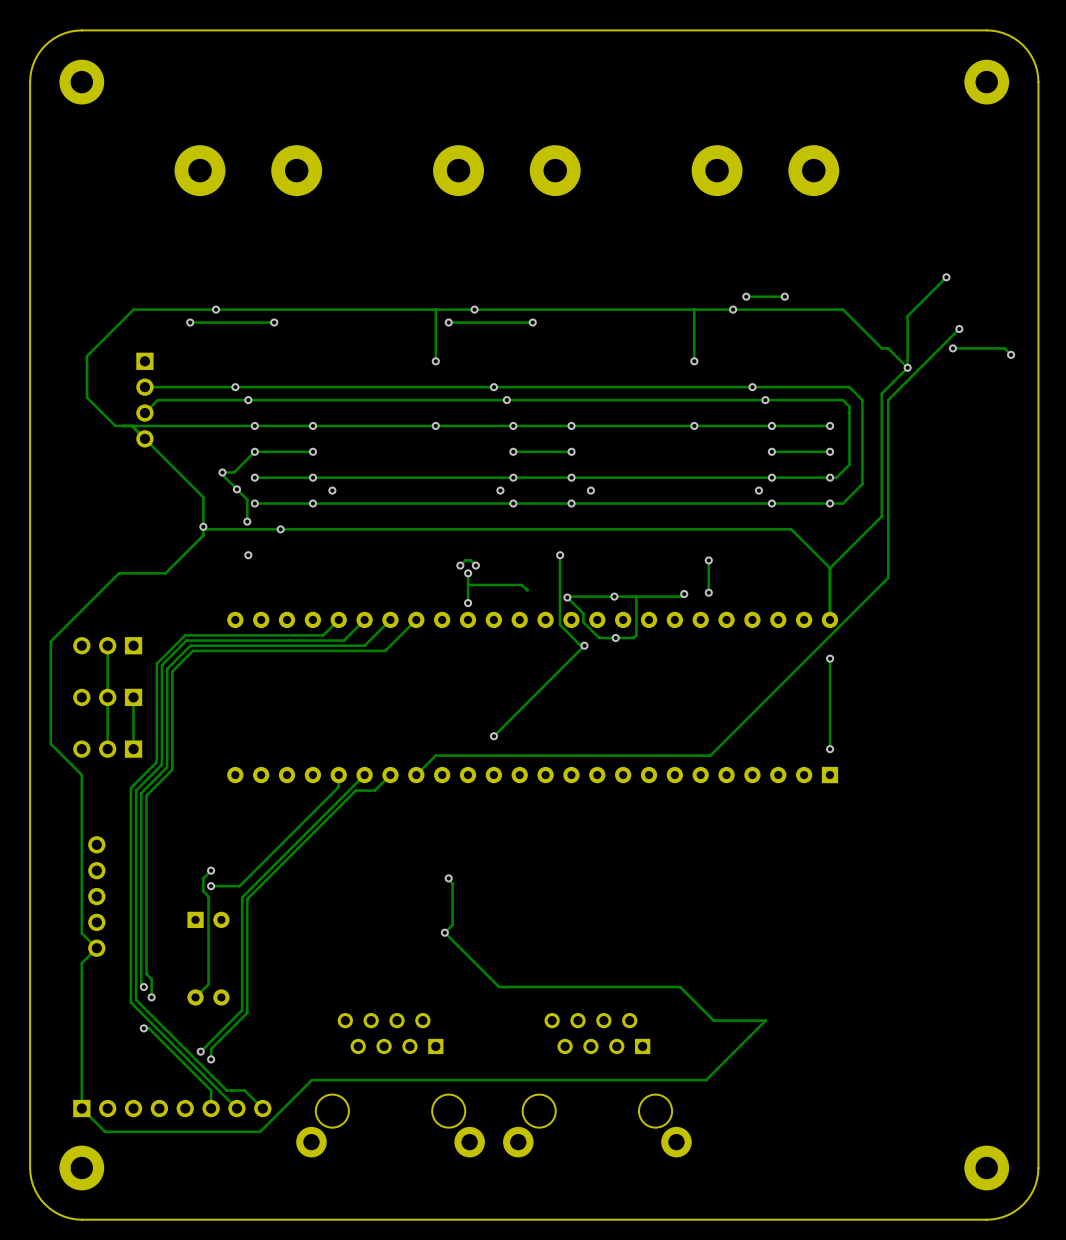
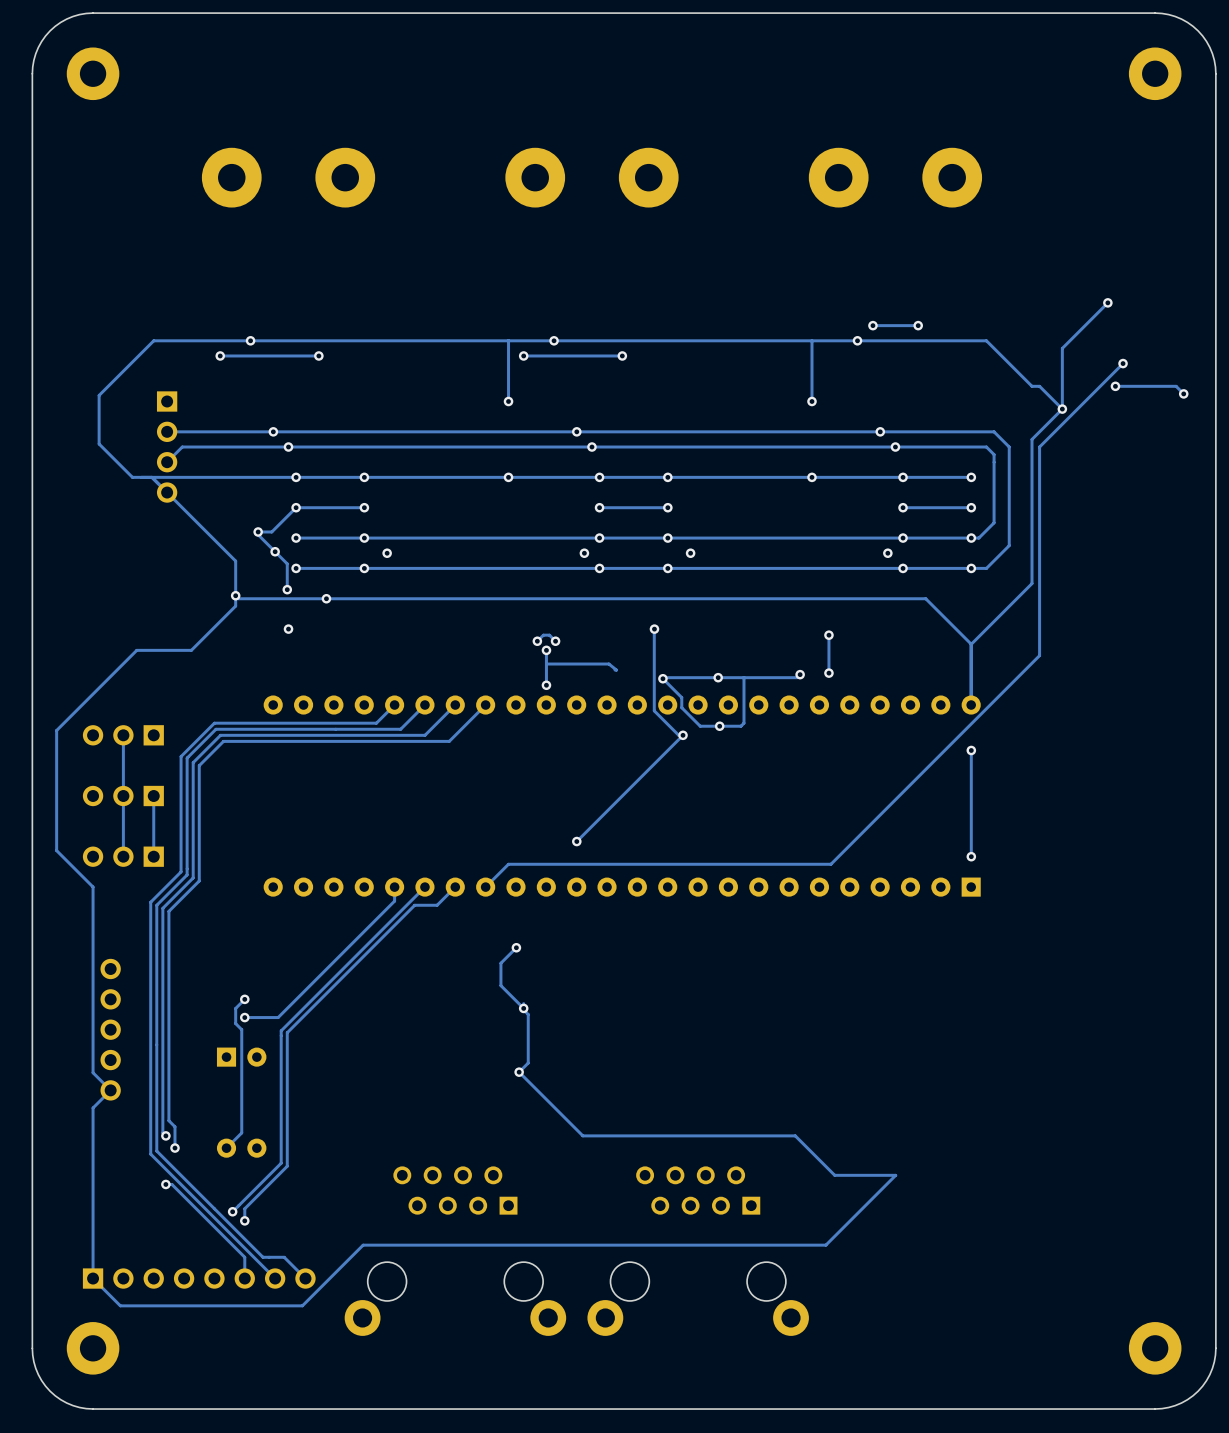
track: none -> (516, 947) (500, 963) (500, 985) (523, 1008) (523, 1003)
via: none -> (516, 947)

